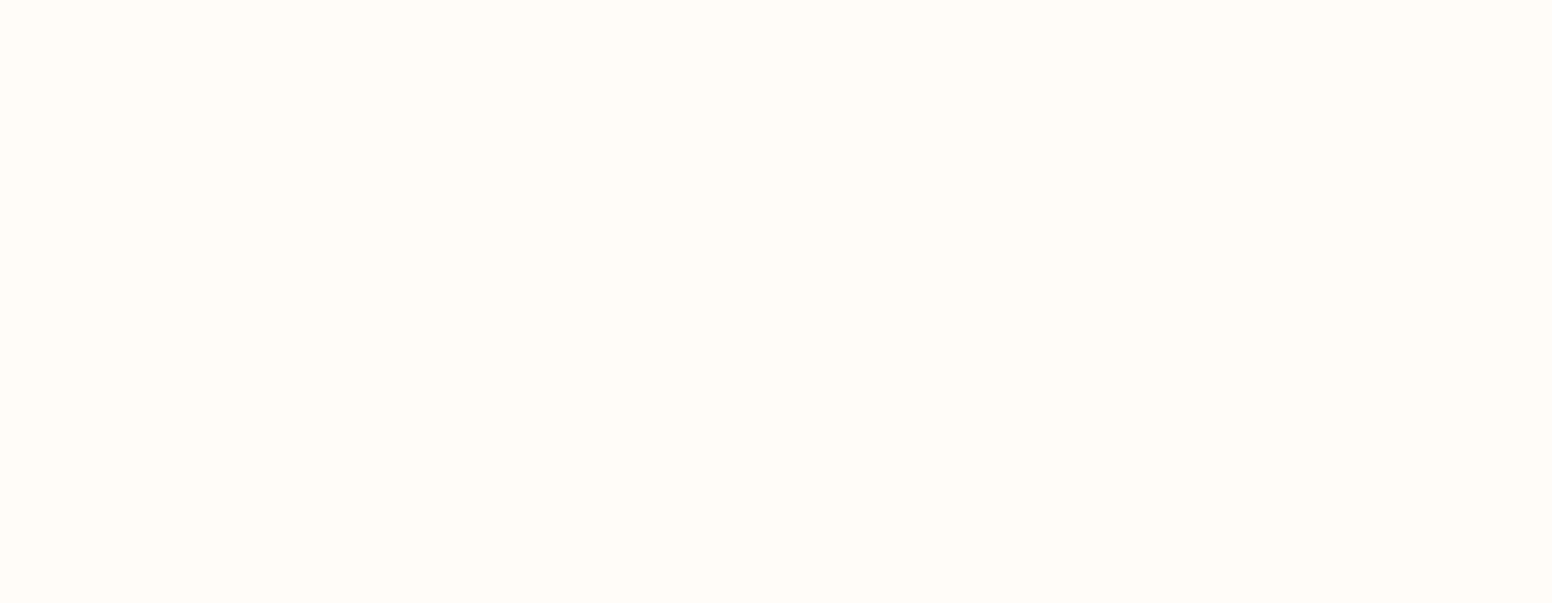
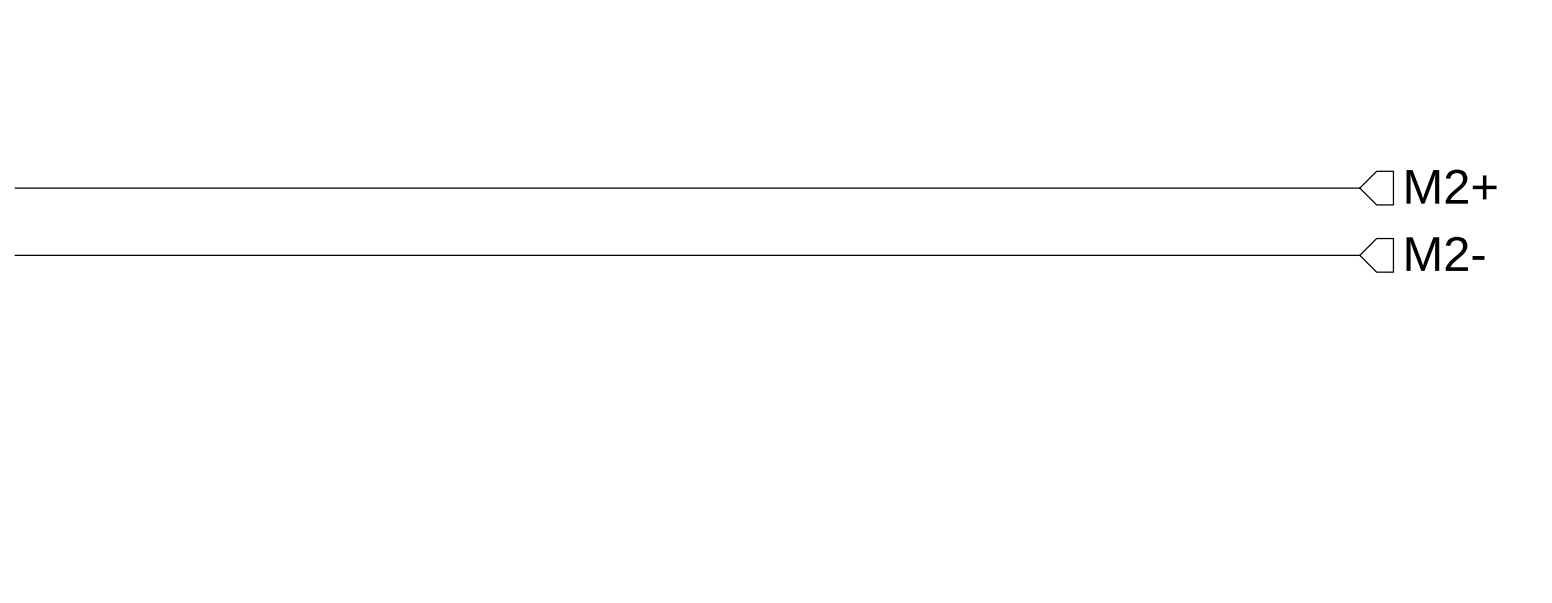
hierarchical label: none -> M2+ (1451, 186)
wire: none -> (15, 188) (1359, 188)
hierarchical label: none -> M2- (1445, 253)
wire: none -> (15, 255) (1359, 255)

